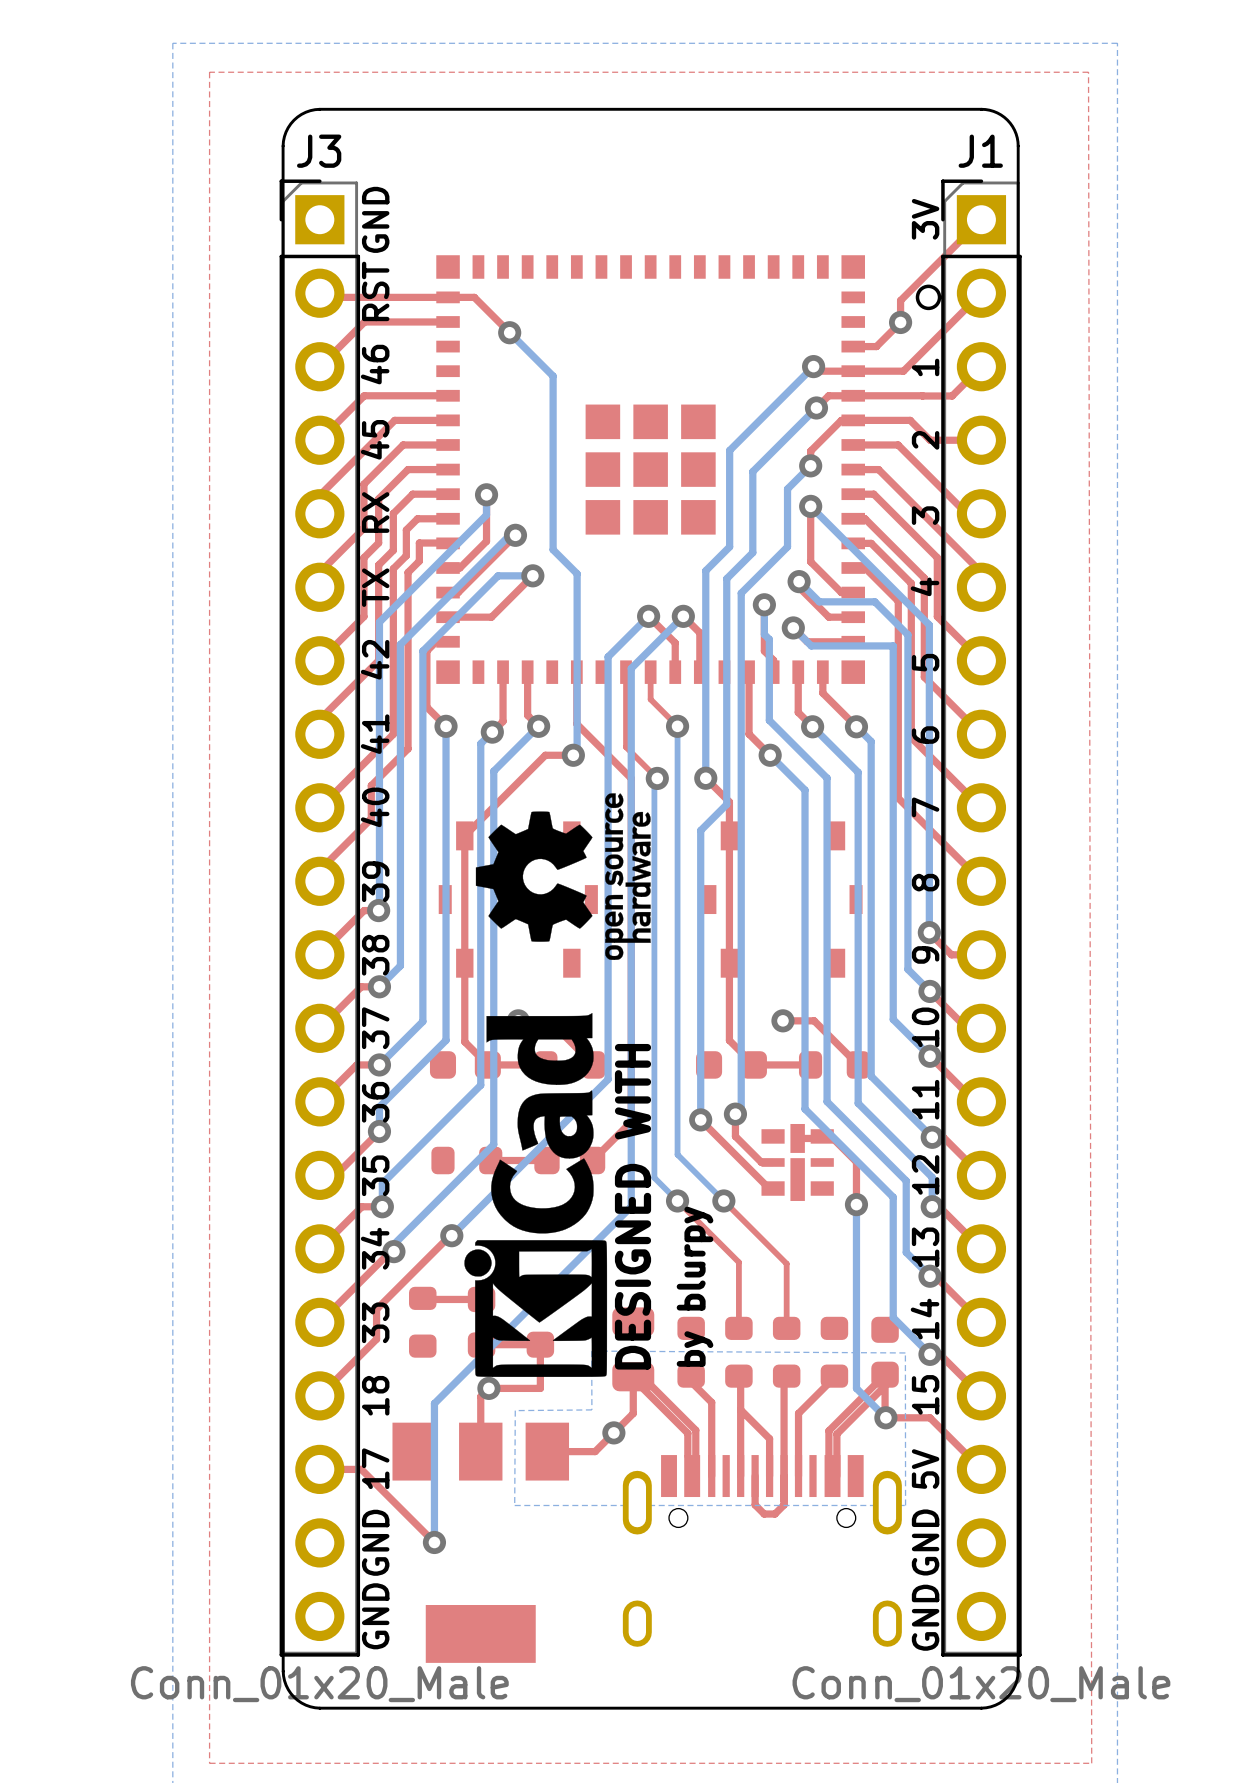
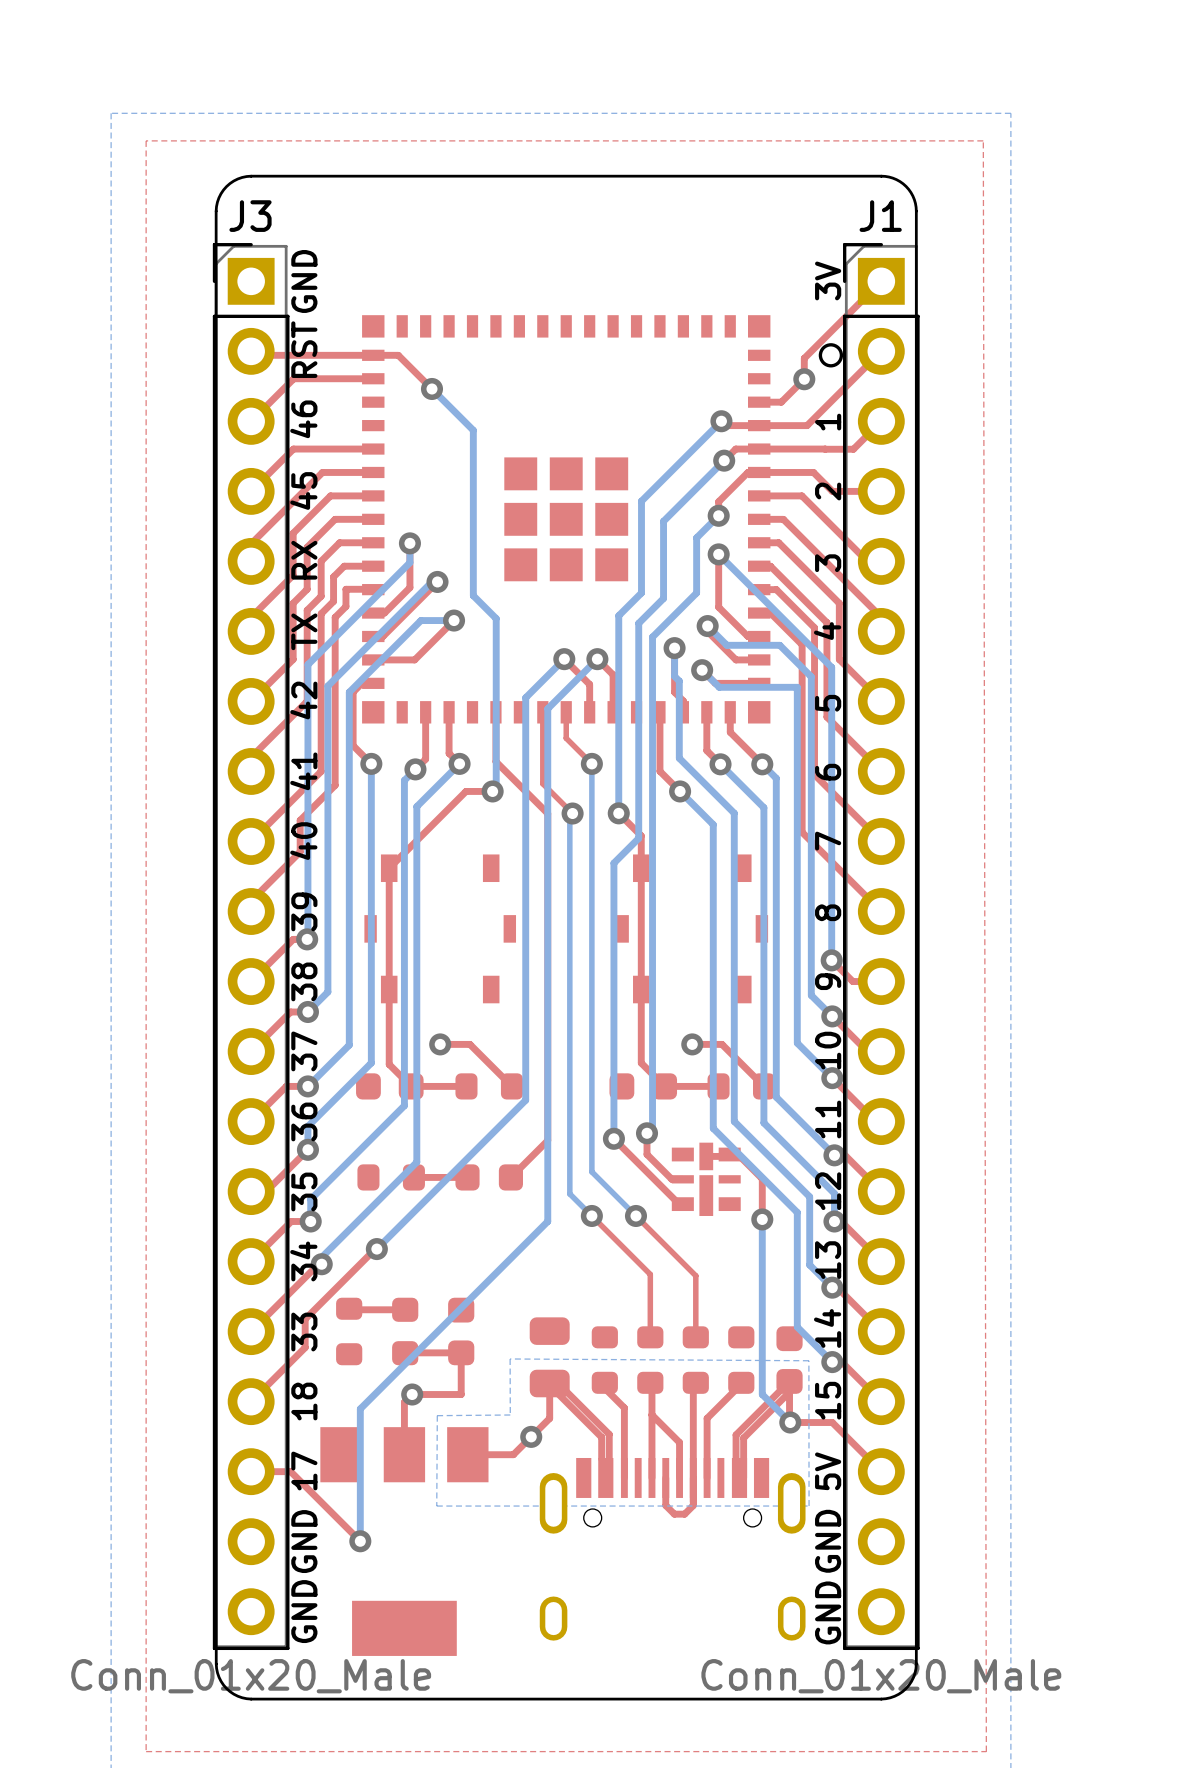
drawing: [475, 793, 651, 960] -> none
drawing: [464, 1013, 608, 1377] -> none
text: DESIGNED WITH (633, 1206) -> none
text: by blurpy (695, 1286) -> none

